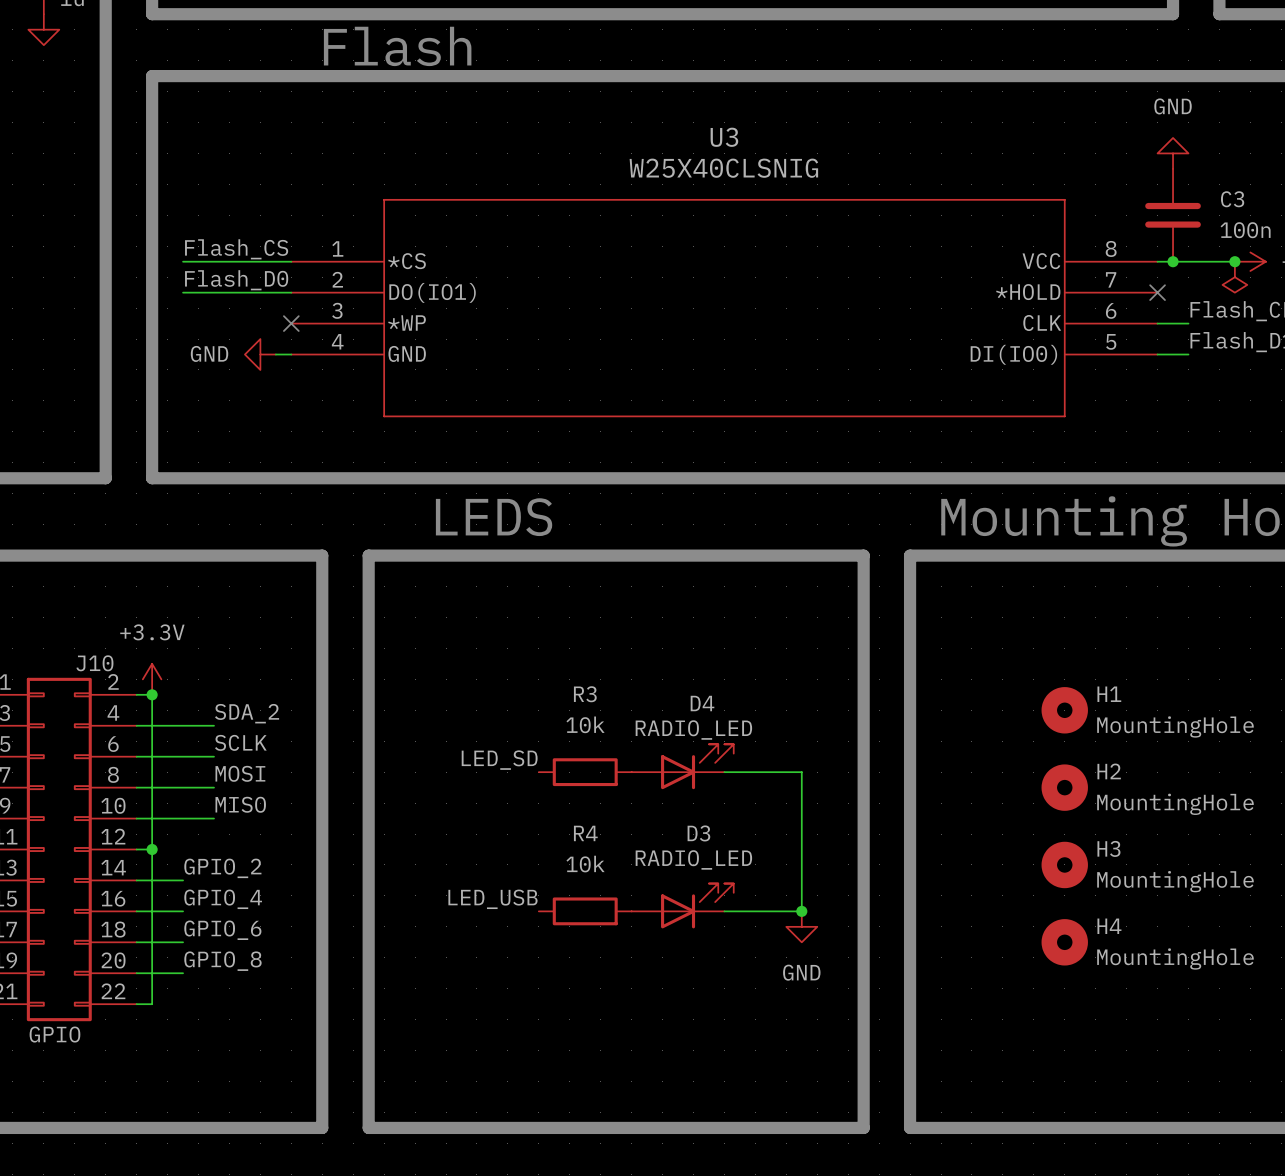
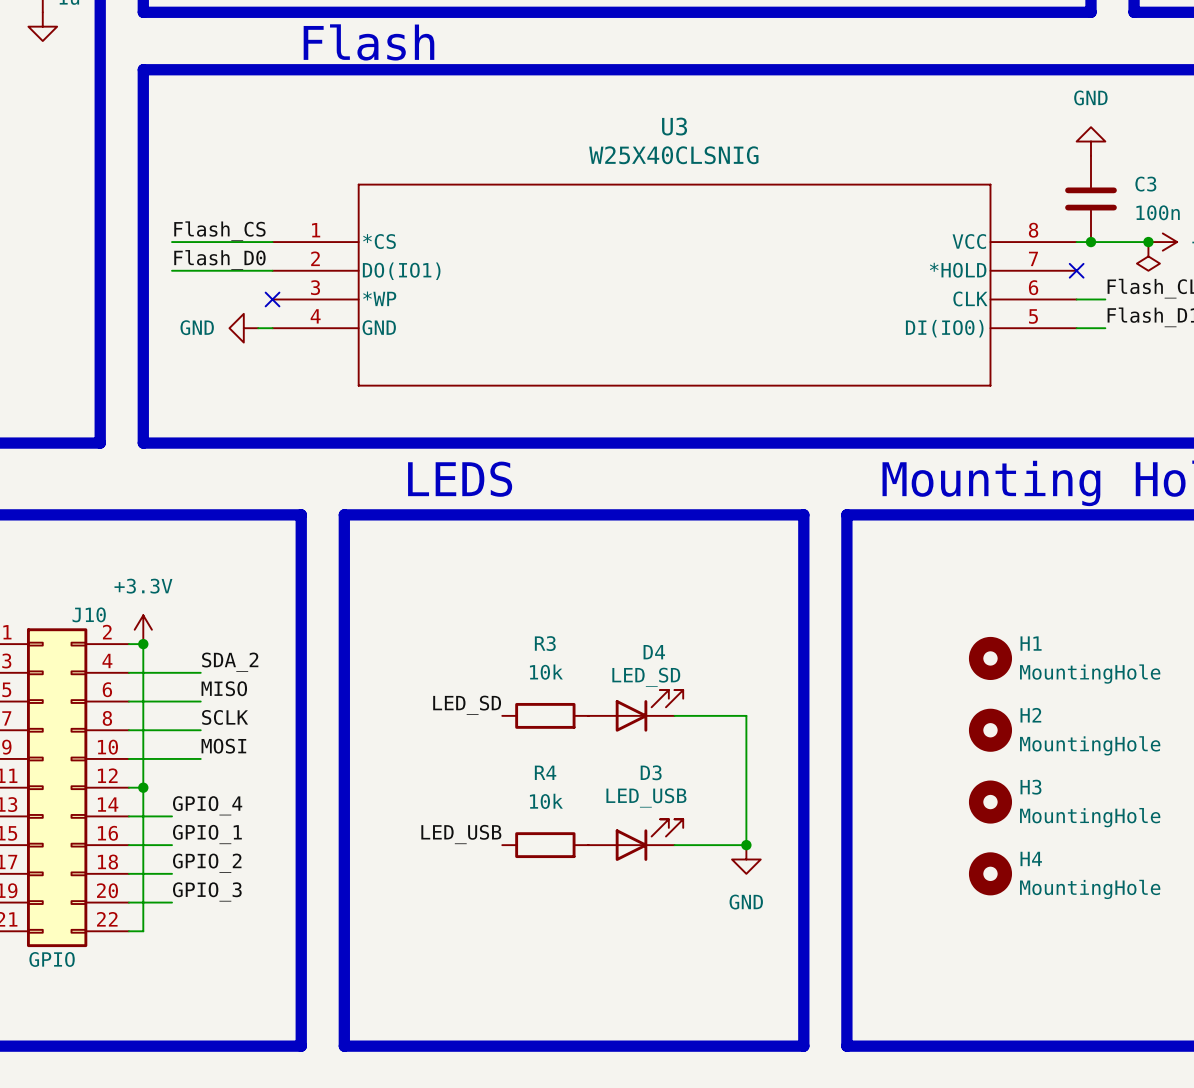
D4 value: RADIO_LED (693, 730) -> LED_SD (646, 677)
label: SCLK (240, 742) -> MISO (224, 688)
label: MOSI (240, 773) -> SCLK (225, 717)
label: MISO (240, 804) -> MOSI (223, 746)
D3 value: RADIO_LED (693, 859) -> LED_USB (646, 797)
label: GPIO_2 (222, 868) -> GPIO_4 (207, 805)
label: GPIO_4 (223, 899) -> GPIO_1 (207, 834)
label: GPIO_6 (222, 930) -> GPIO_2 (207, 863)
label: GPIO_8 (222, 961) -> GPIO_3 (207, 891)

